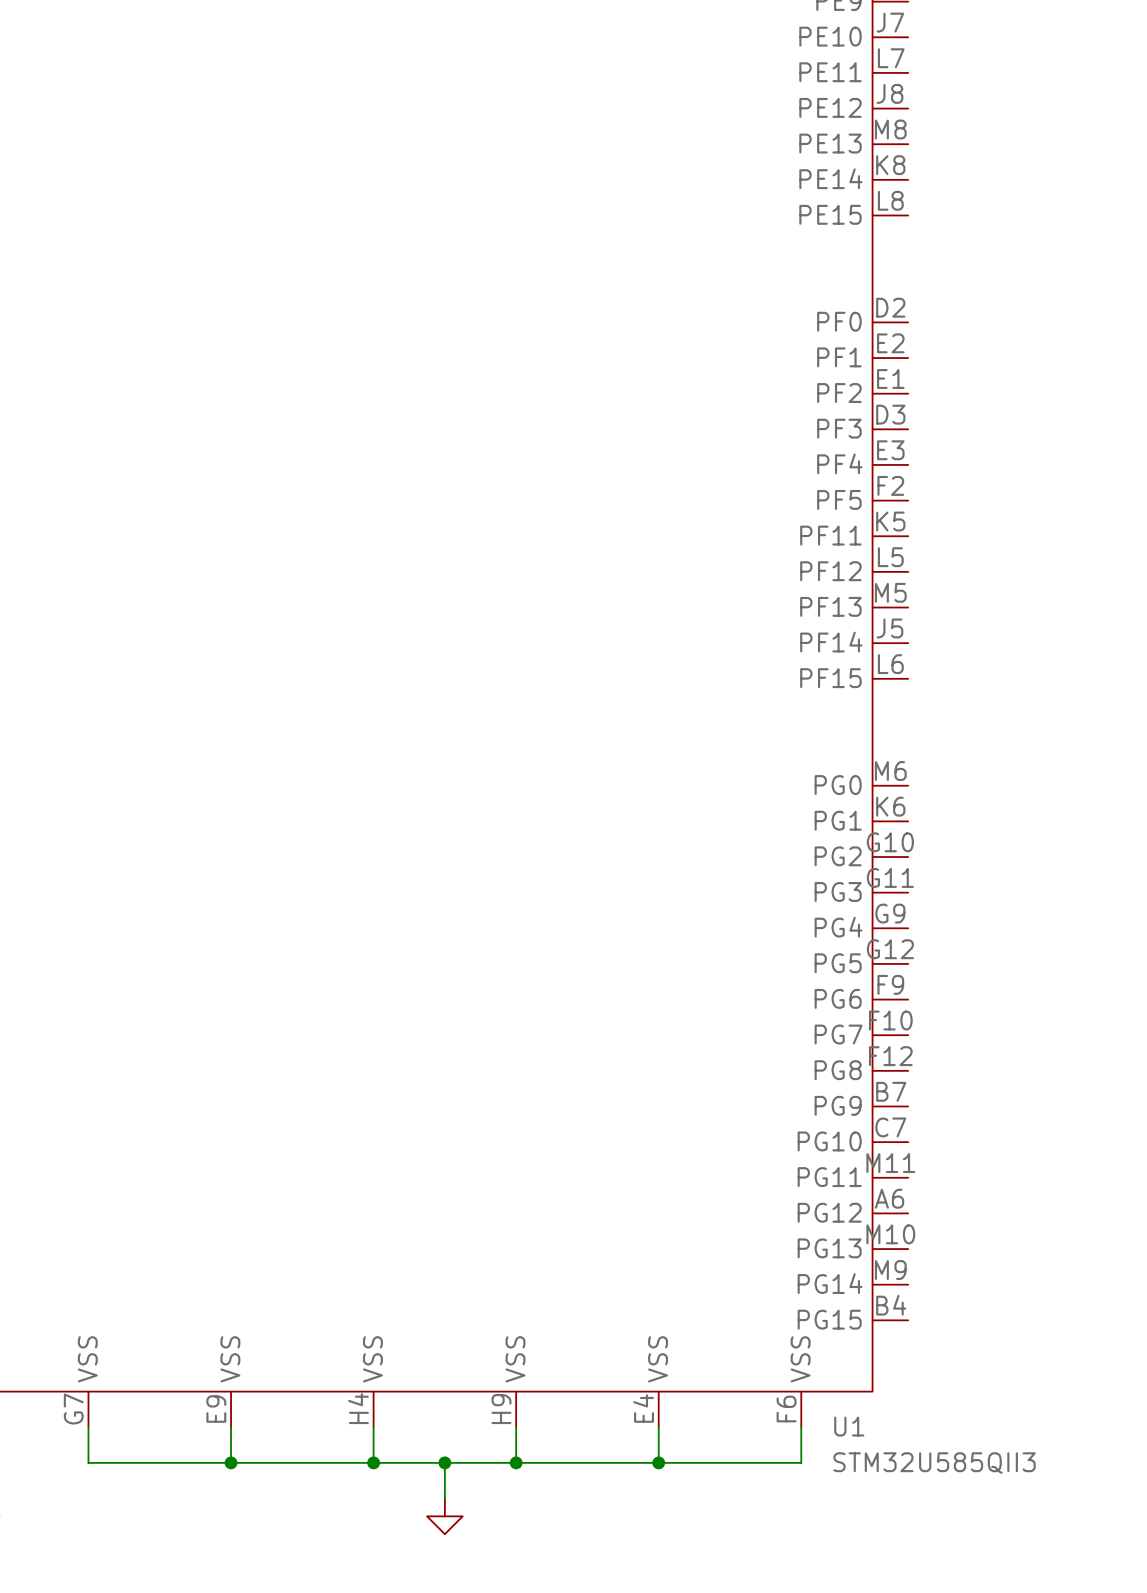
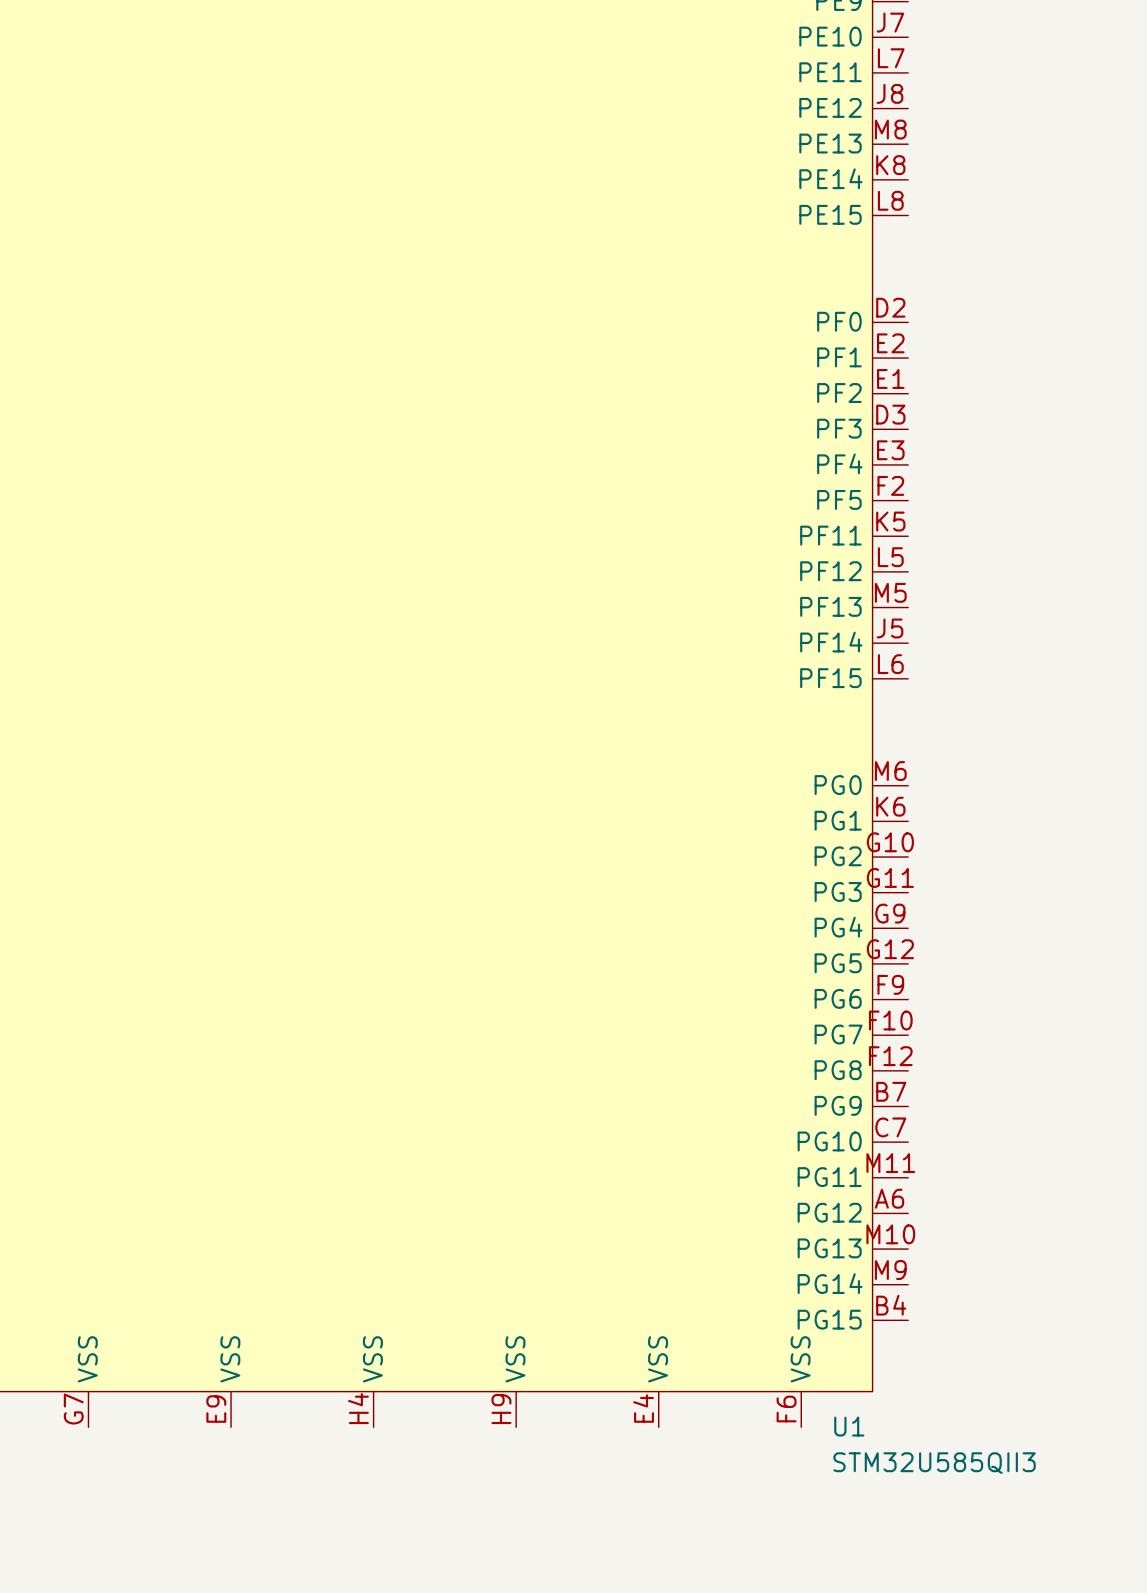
wire: (88, 1427) (88, 1462) (801, 1462) (801, 1427) -> none
wire: (231, 1427) (231, 1462) -> none
wire: (373, 1427) (373, 1462) -> none
wire: (516, 1427) (516, 1462) -> none
wire: (658, 1427) (658, 1462) -> none
junction: (231, 1462) -> none
junction: (373, 1462) -> none
wire: (444, 1462) (444, 1498) -> none
junction: (444, 1462) -> none
junction: (516, 1462) -> none
junction: (658, 1462) -> none
power symbol: (444, 1516) -> none

